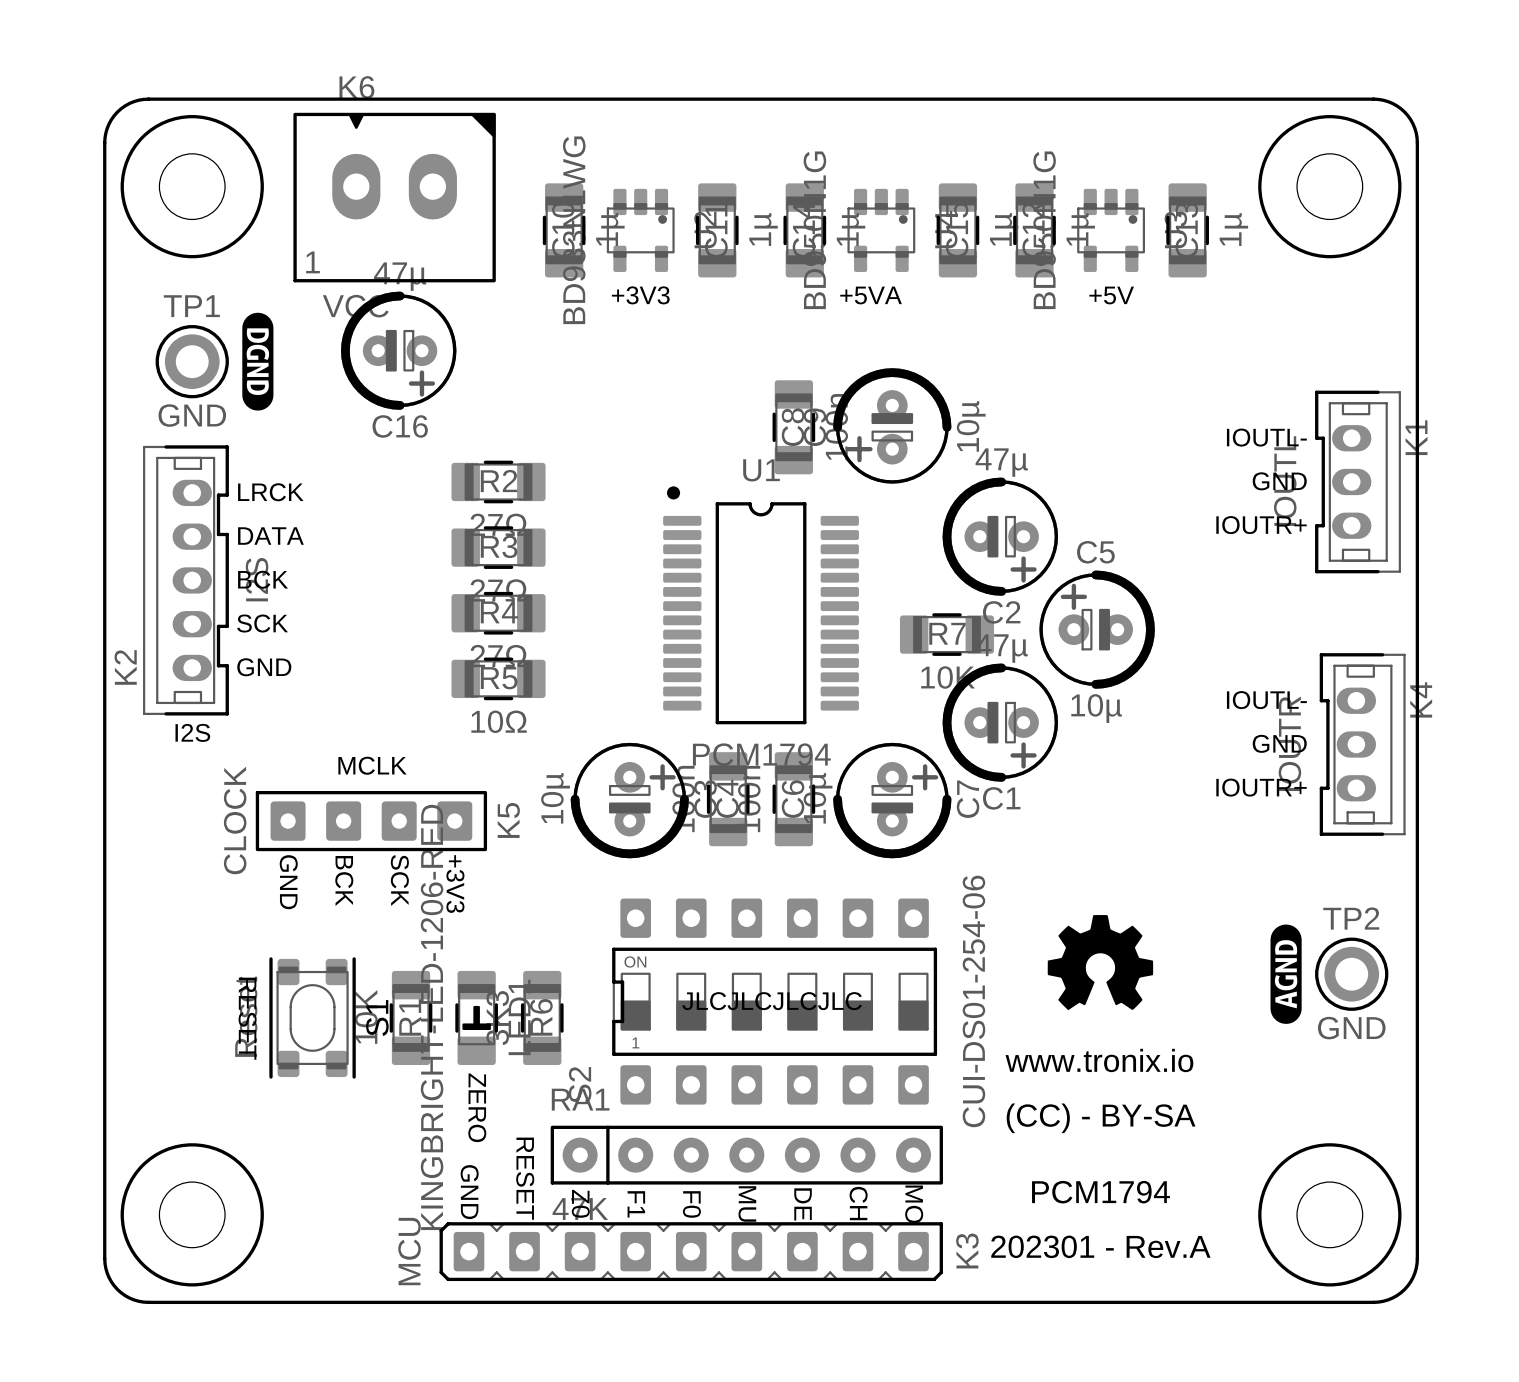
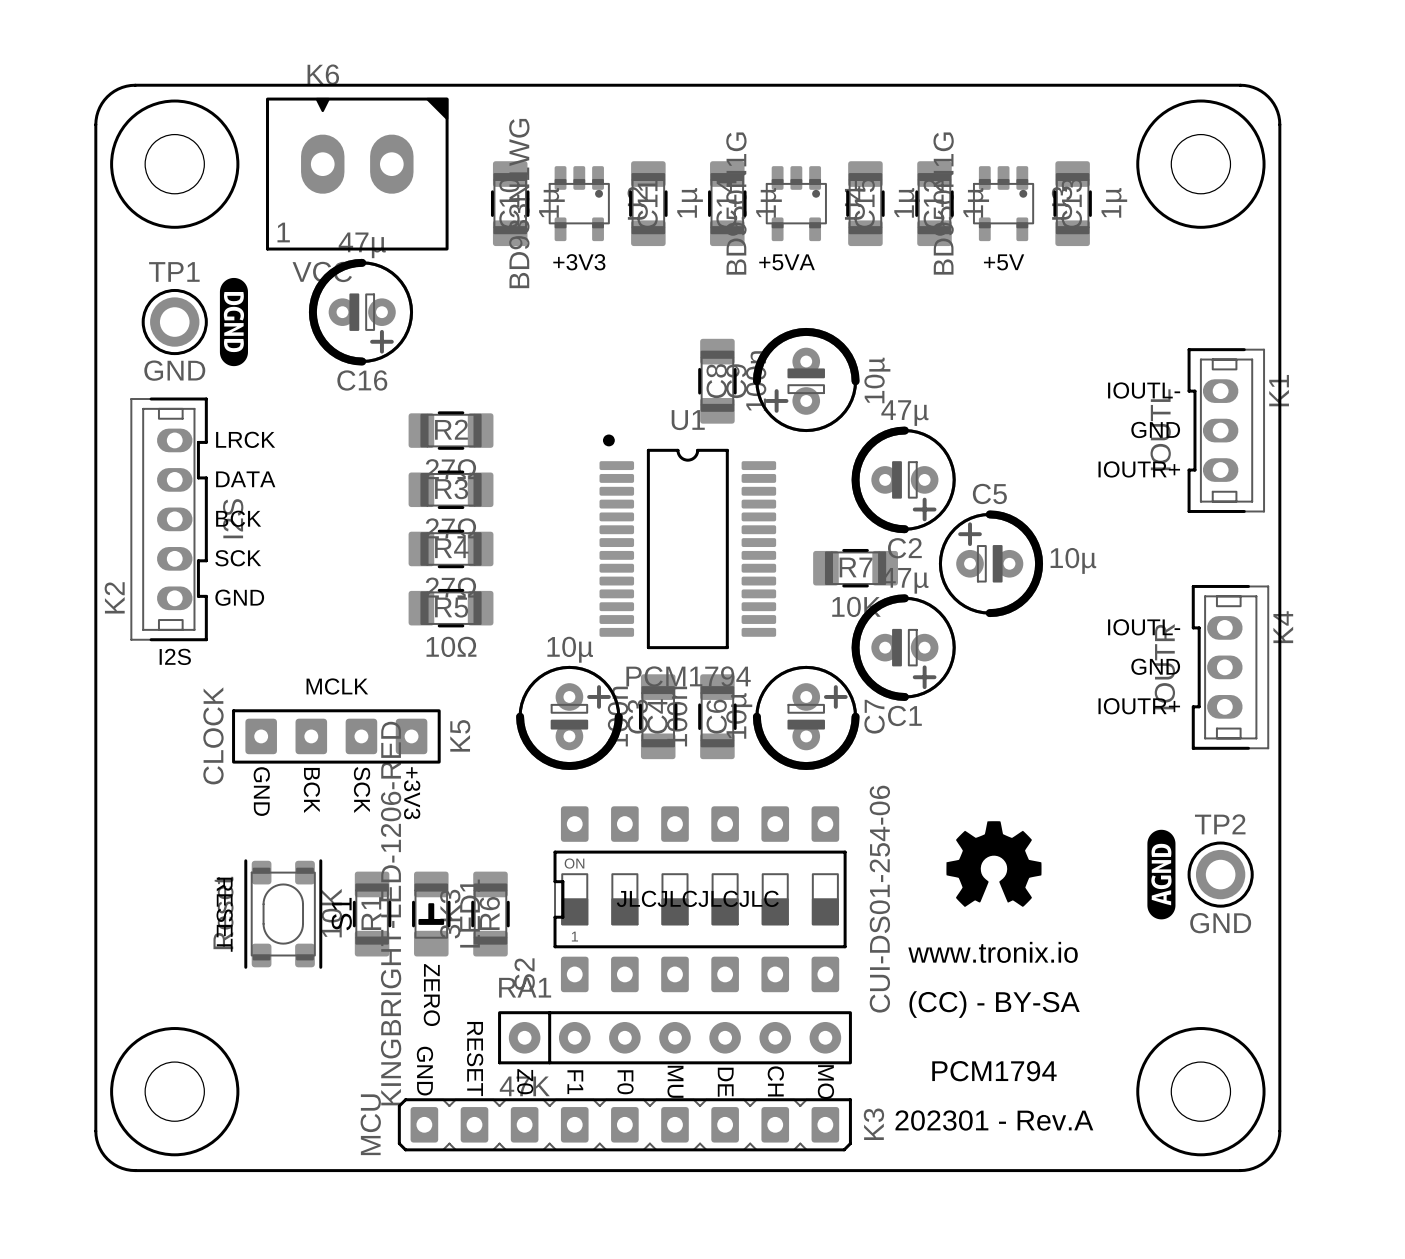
C5 value position: 10µ (1096, 708) -> 10µ (1073, 560)
C3 value rotation: 0° (555, 798) -> 90° clockwise (570, 649)
C3 value position: 10µ (555, 798) -> 10µ (570, 649)

